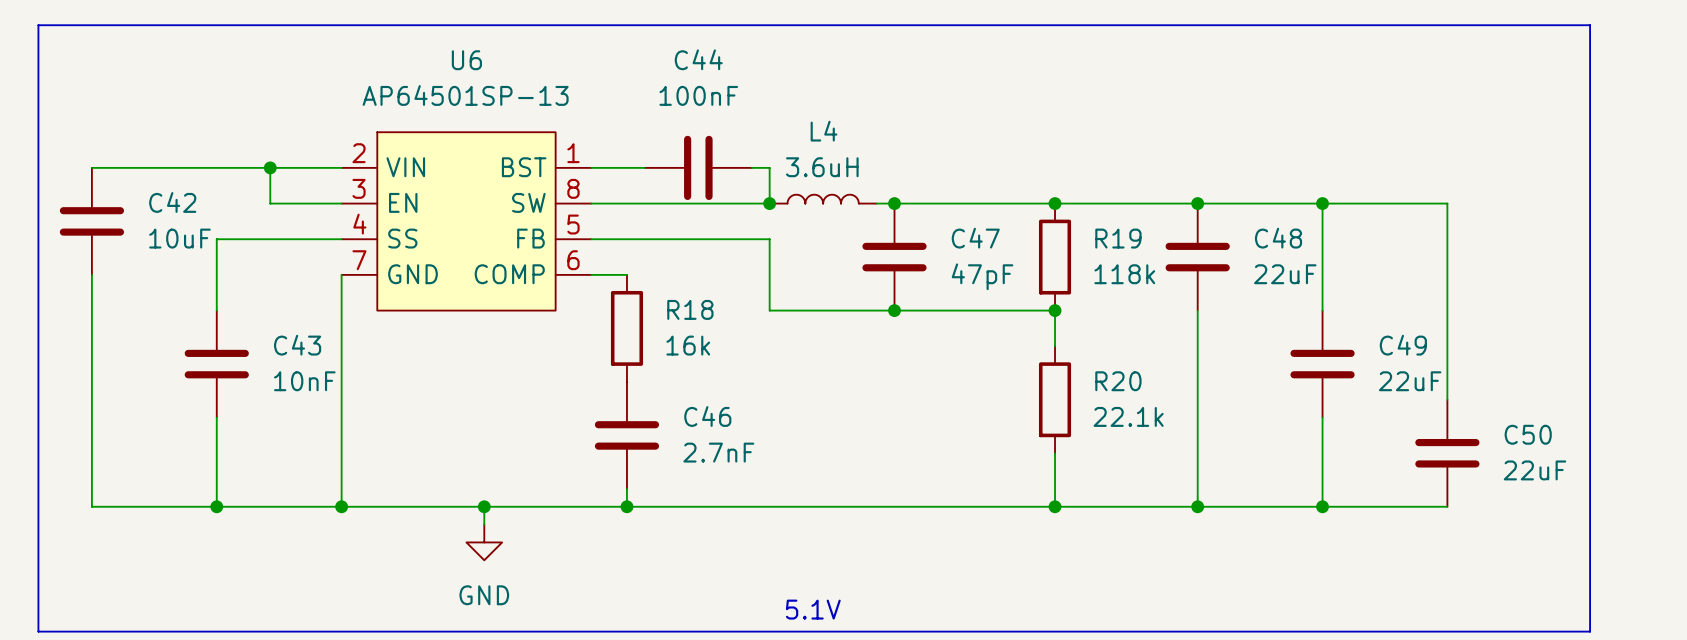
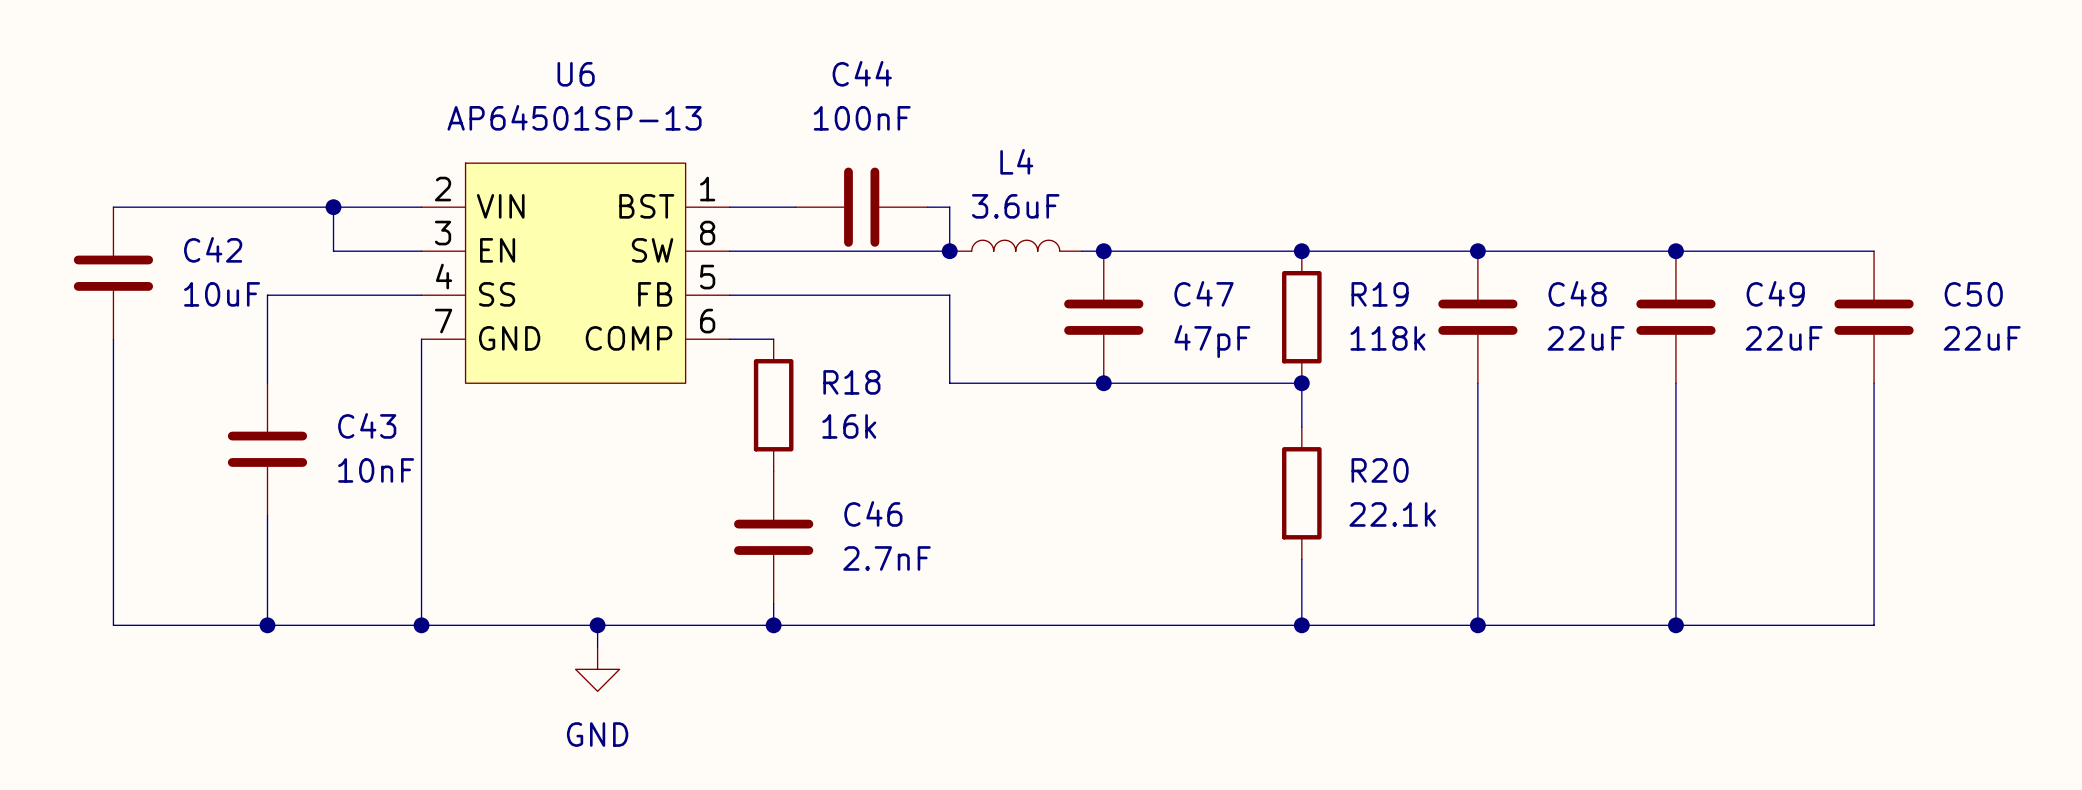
line: (38, 25) (38, 631) (1590, 631) (1590, 25) (38, 25) -> none
L4 value: 3.6uH (822, 167) -> 3.6uF (1015, 206)
wire: (1322, 203) (1322, 310) -> none
junction position: (1322, 203) -> (1675, 251)
wire: (1447, 203) (1447, 399) -> (1785, 251) (1874, 251)
wire: none -> (1675, 383) (1675, 625)
wire: none -> (1874, 383) (1874, 625) (1785, 625)
C49 position: (1322, 364) -> (1675, 317)
wire: (1322, 417) (1322, 506) -> none
C50 position: (1447, 453) -> (1874, 317)
junction position: (1322, 506) -> (1675, 625)
text: 5.1V (813, 609) -> none

